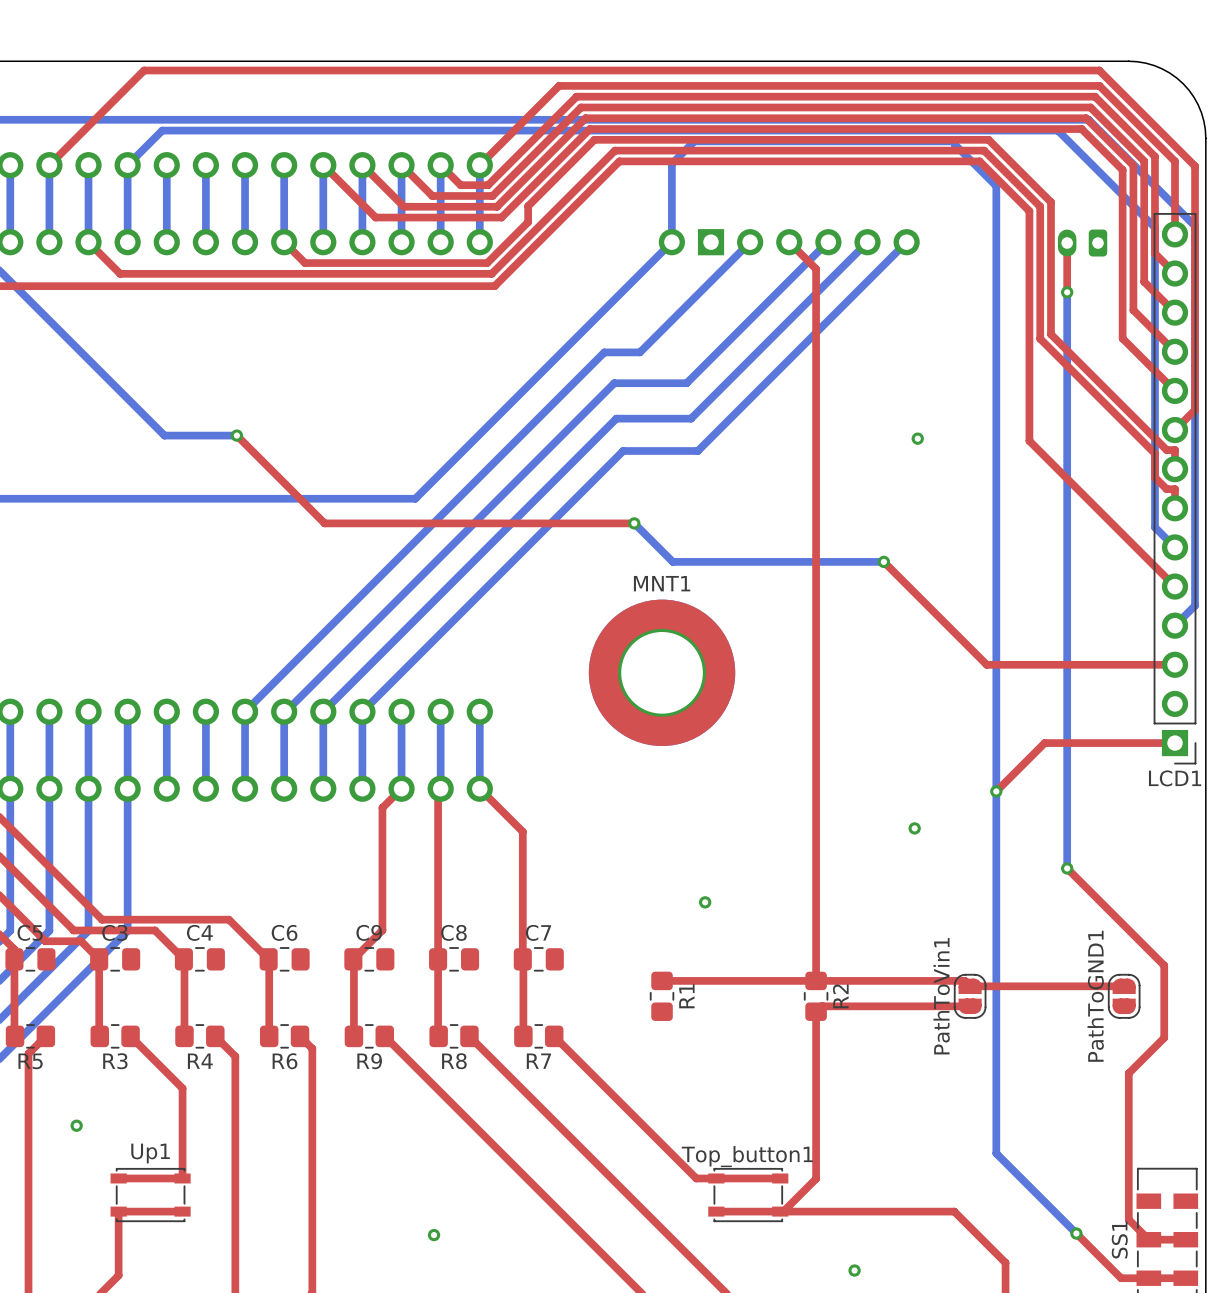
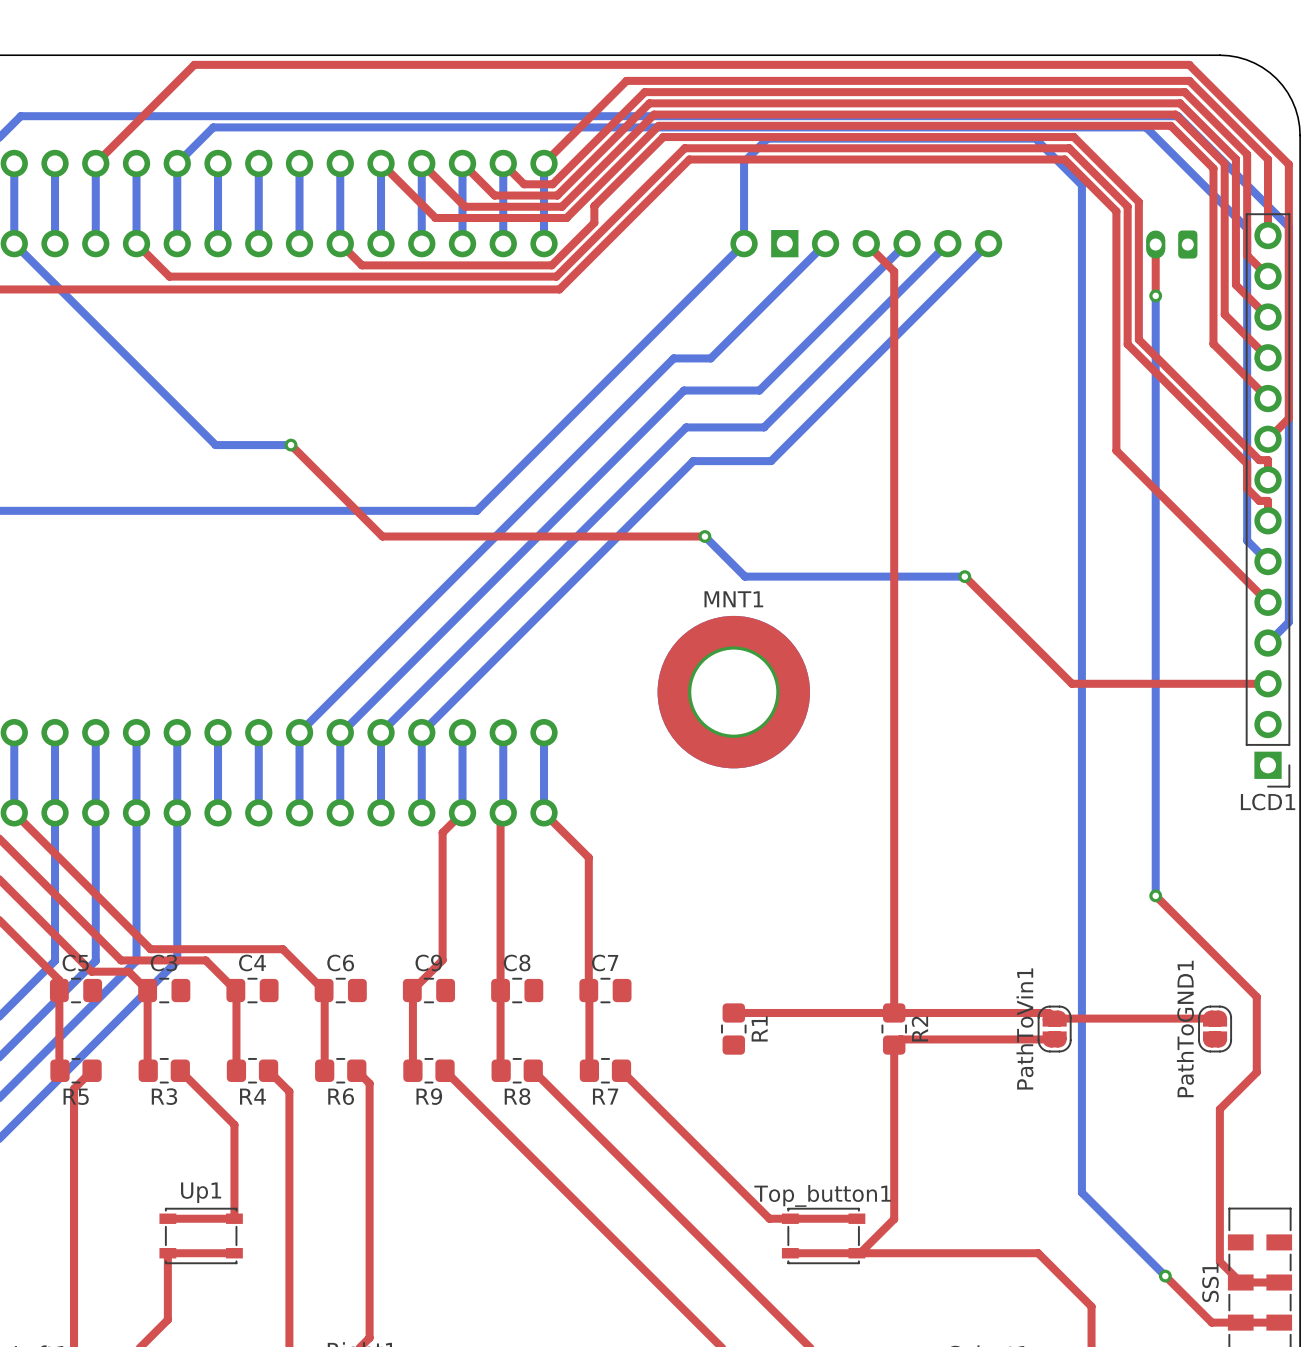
via: (917, 438) -> none
top track: (1175, 743) (1044, 743) (996, 791) -> none
via: (996, 791) -> none
via: (914, 828) -> none
via: (705, 902) -> none
via: (76, 1125) -> none
via: (434, 1235) -> none
via: (854, 1270) -> none

